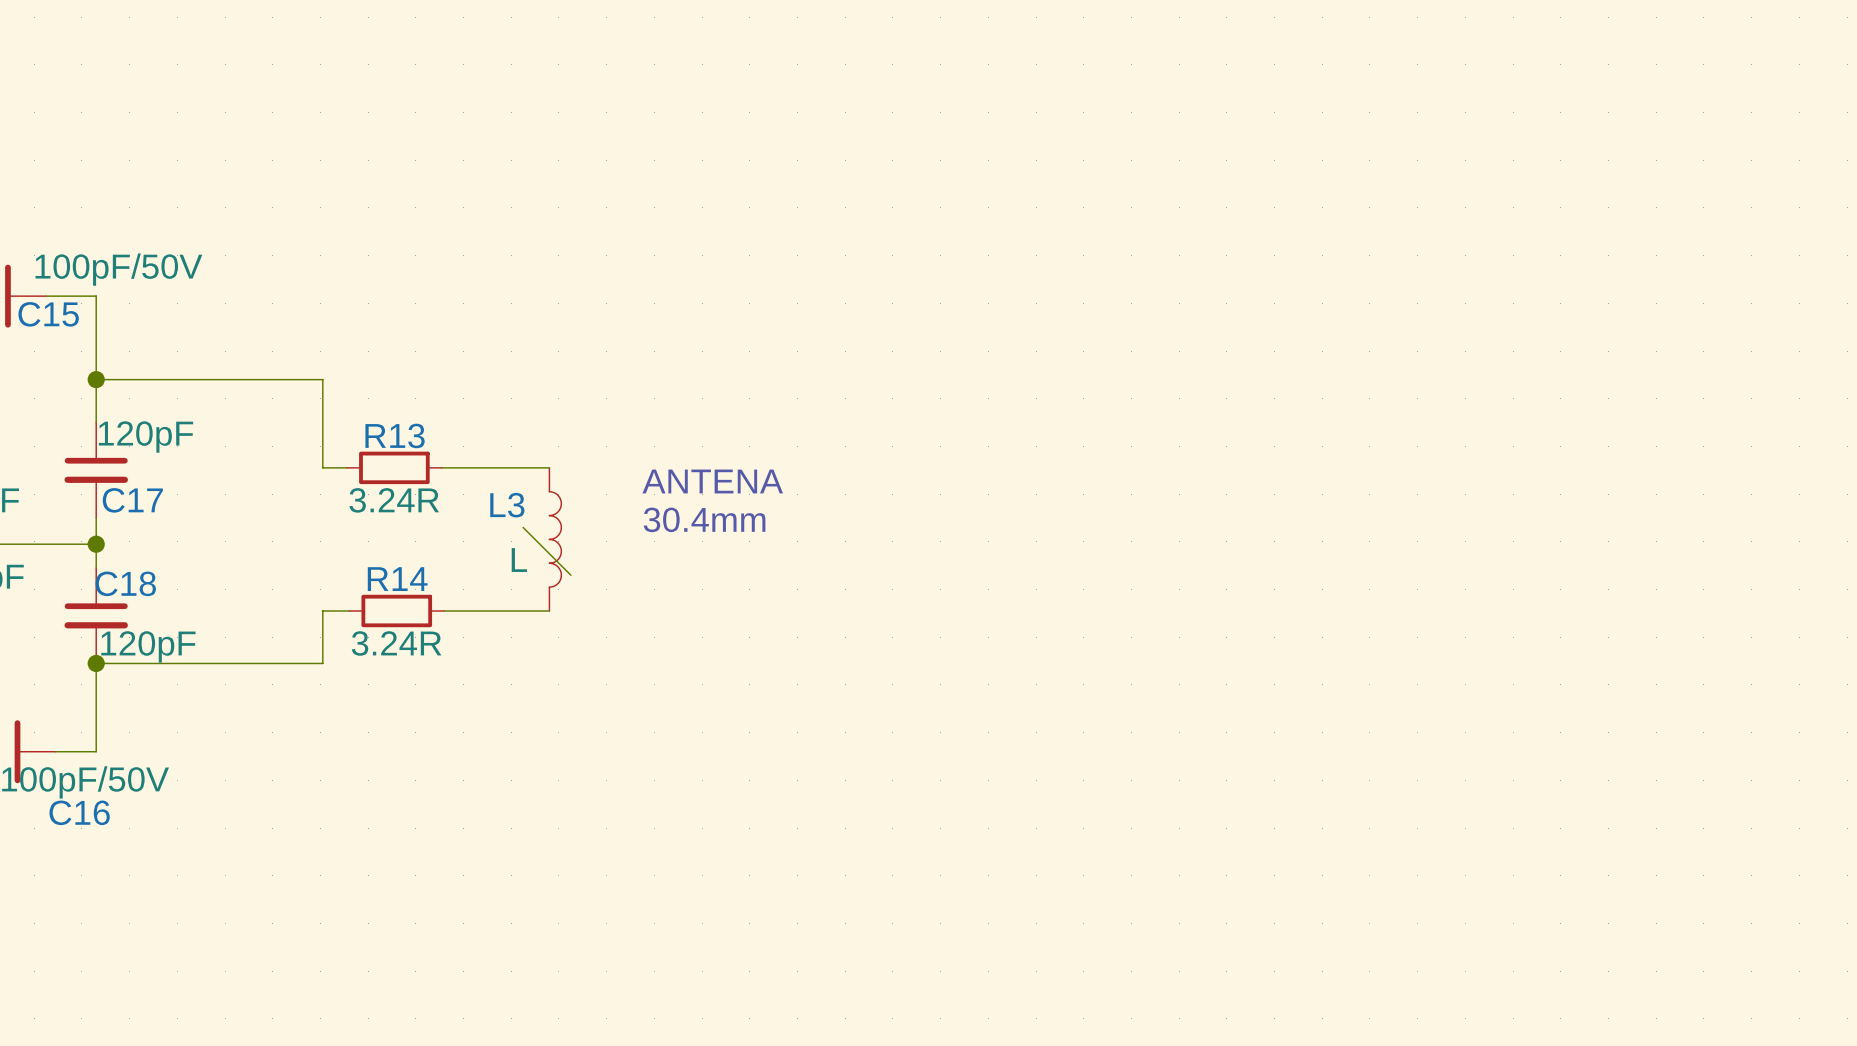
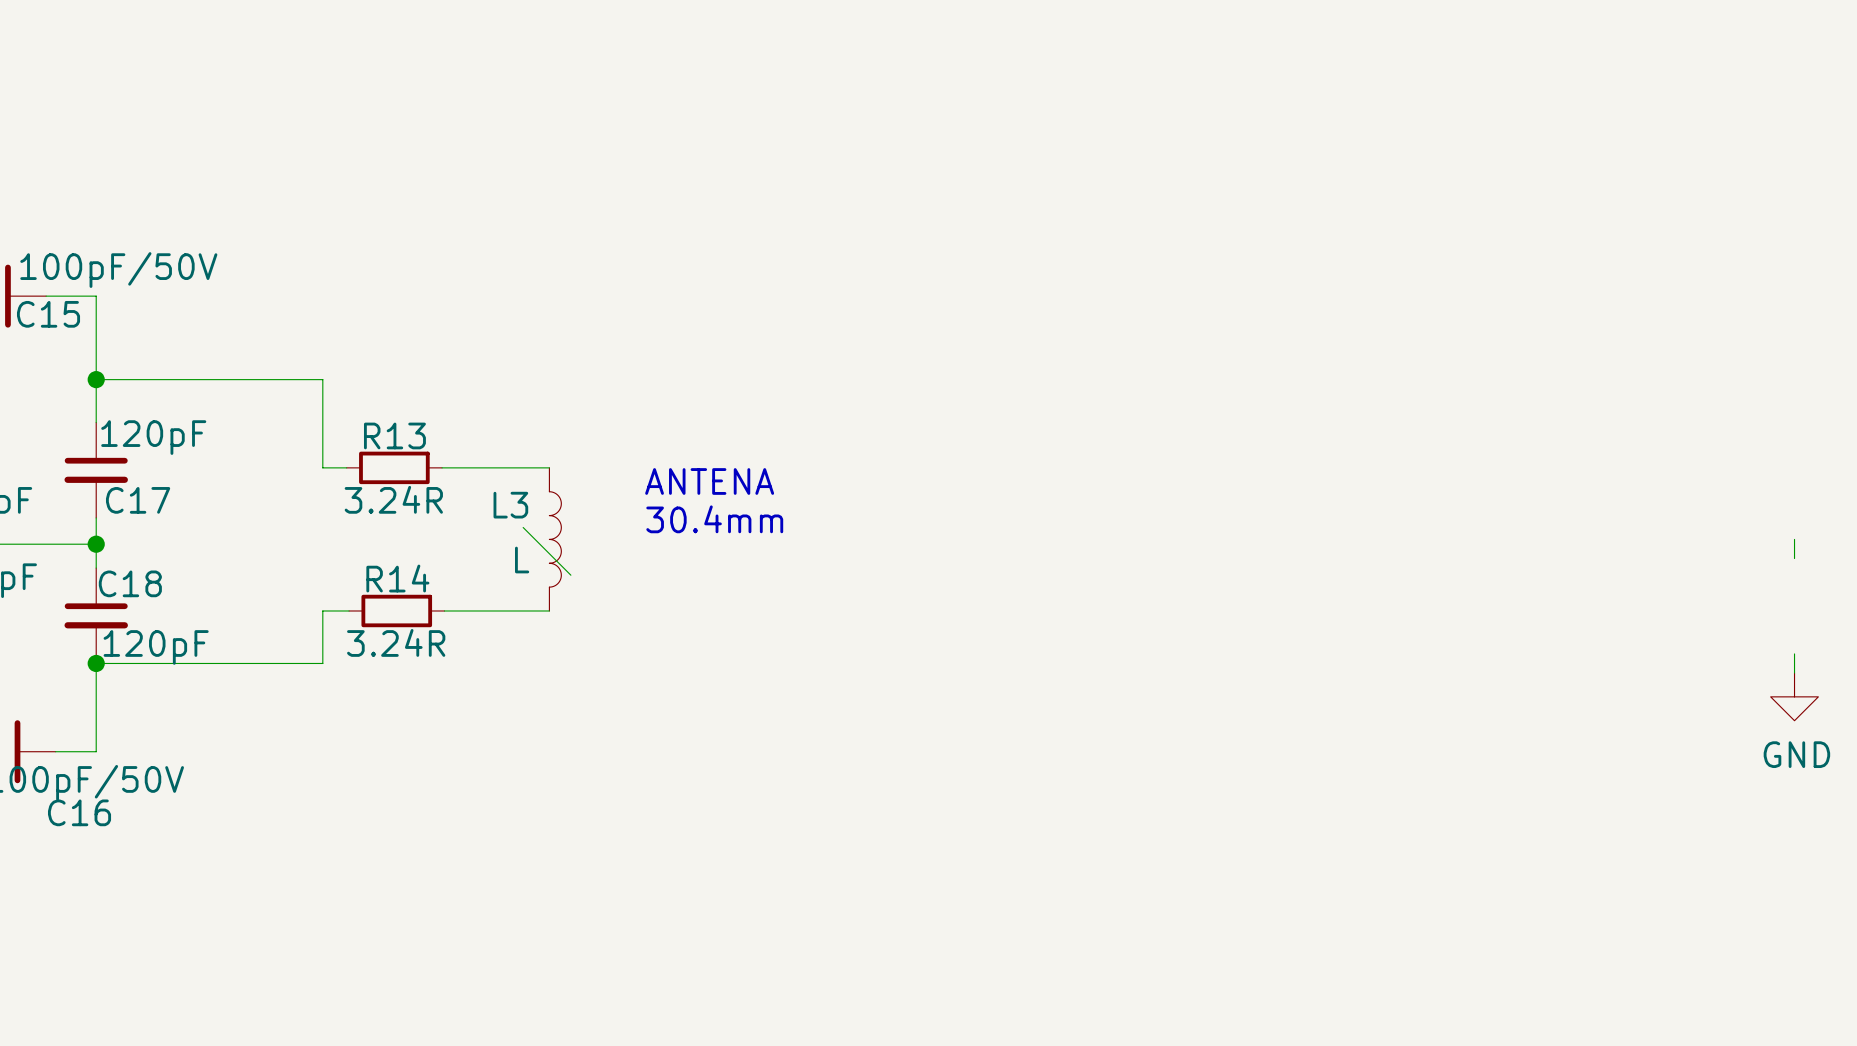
wire: none -> (1794, 539) (1794, 558)
wire: none -> (1794, 653) (1794, 673)
power symbol: none -> GND (1794, 696)

